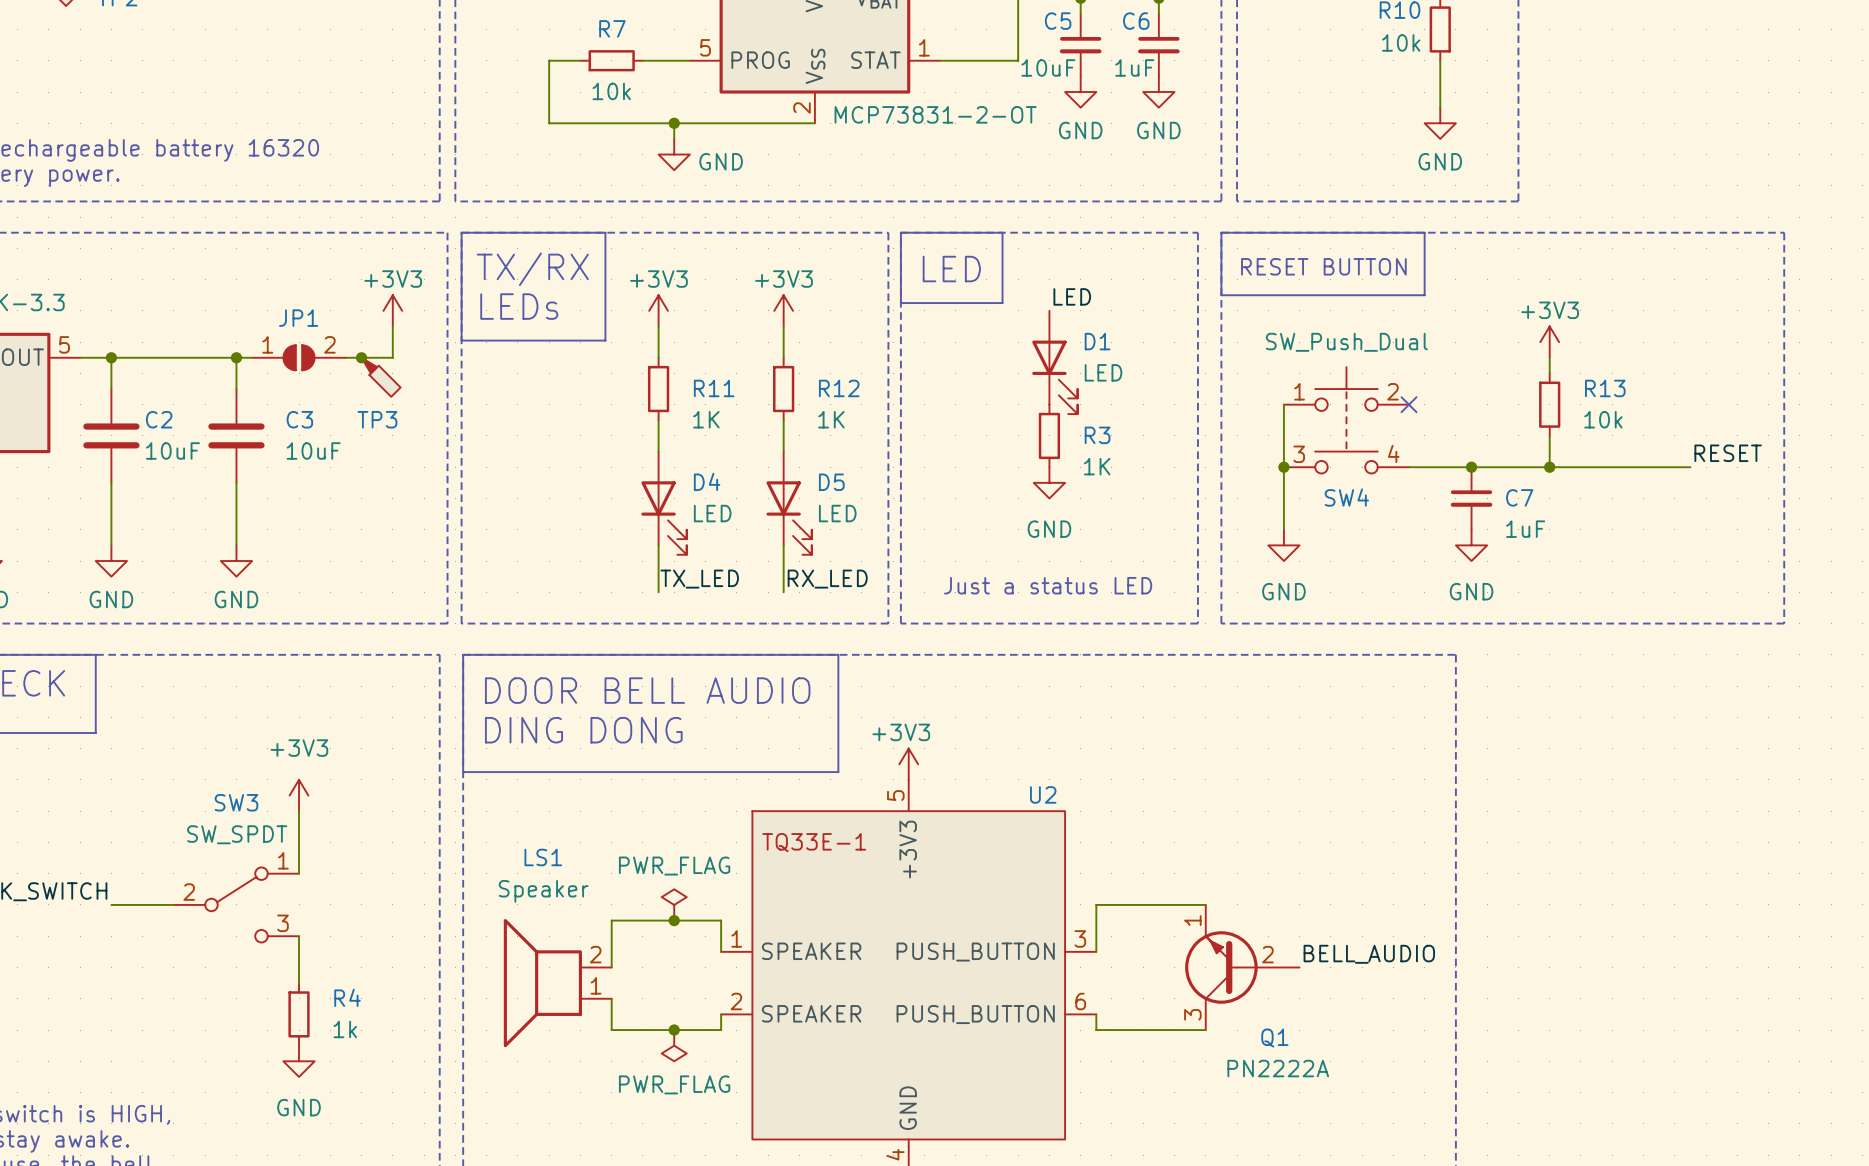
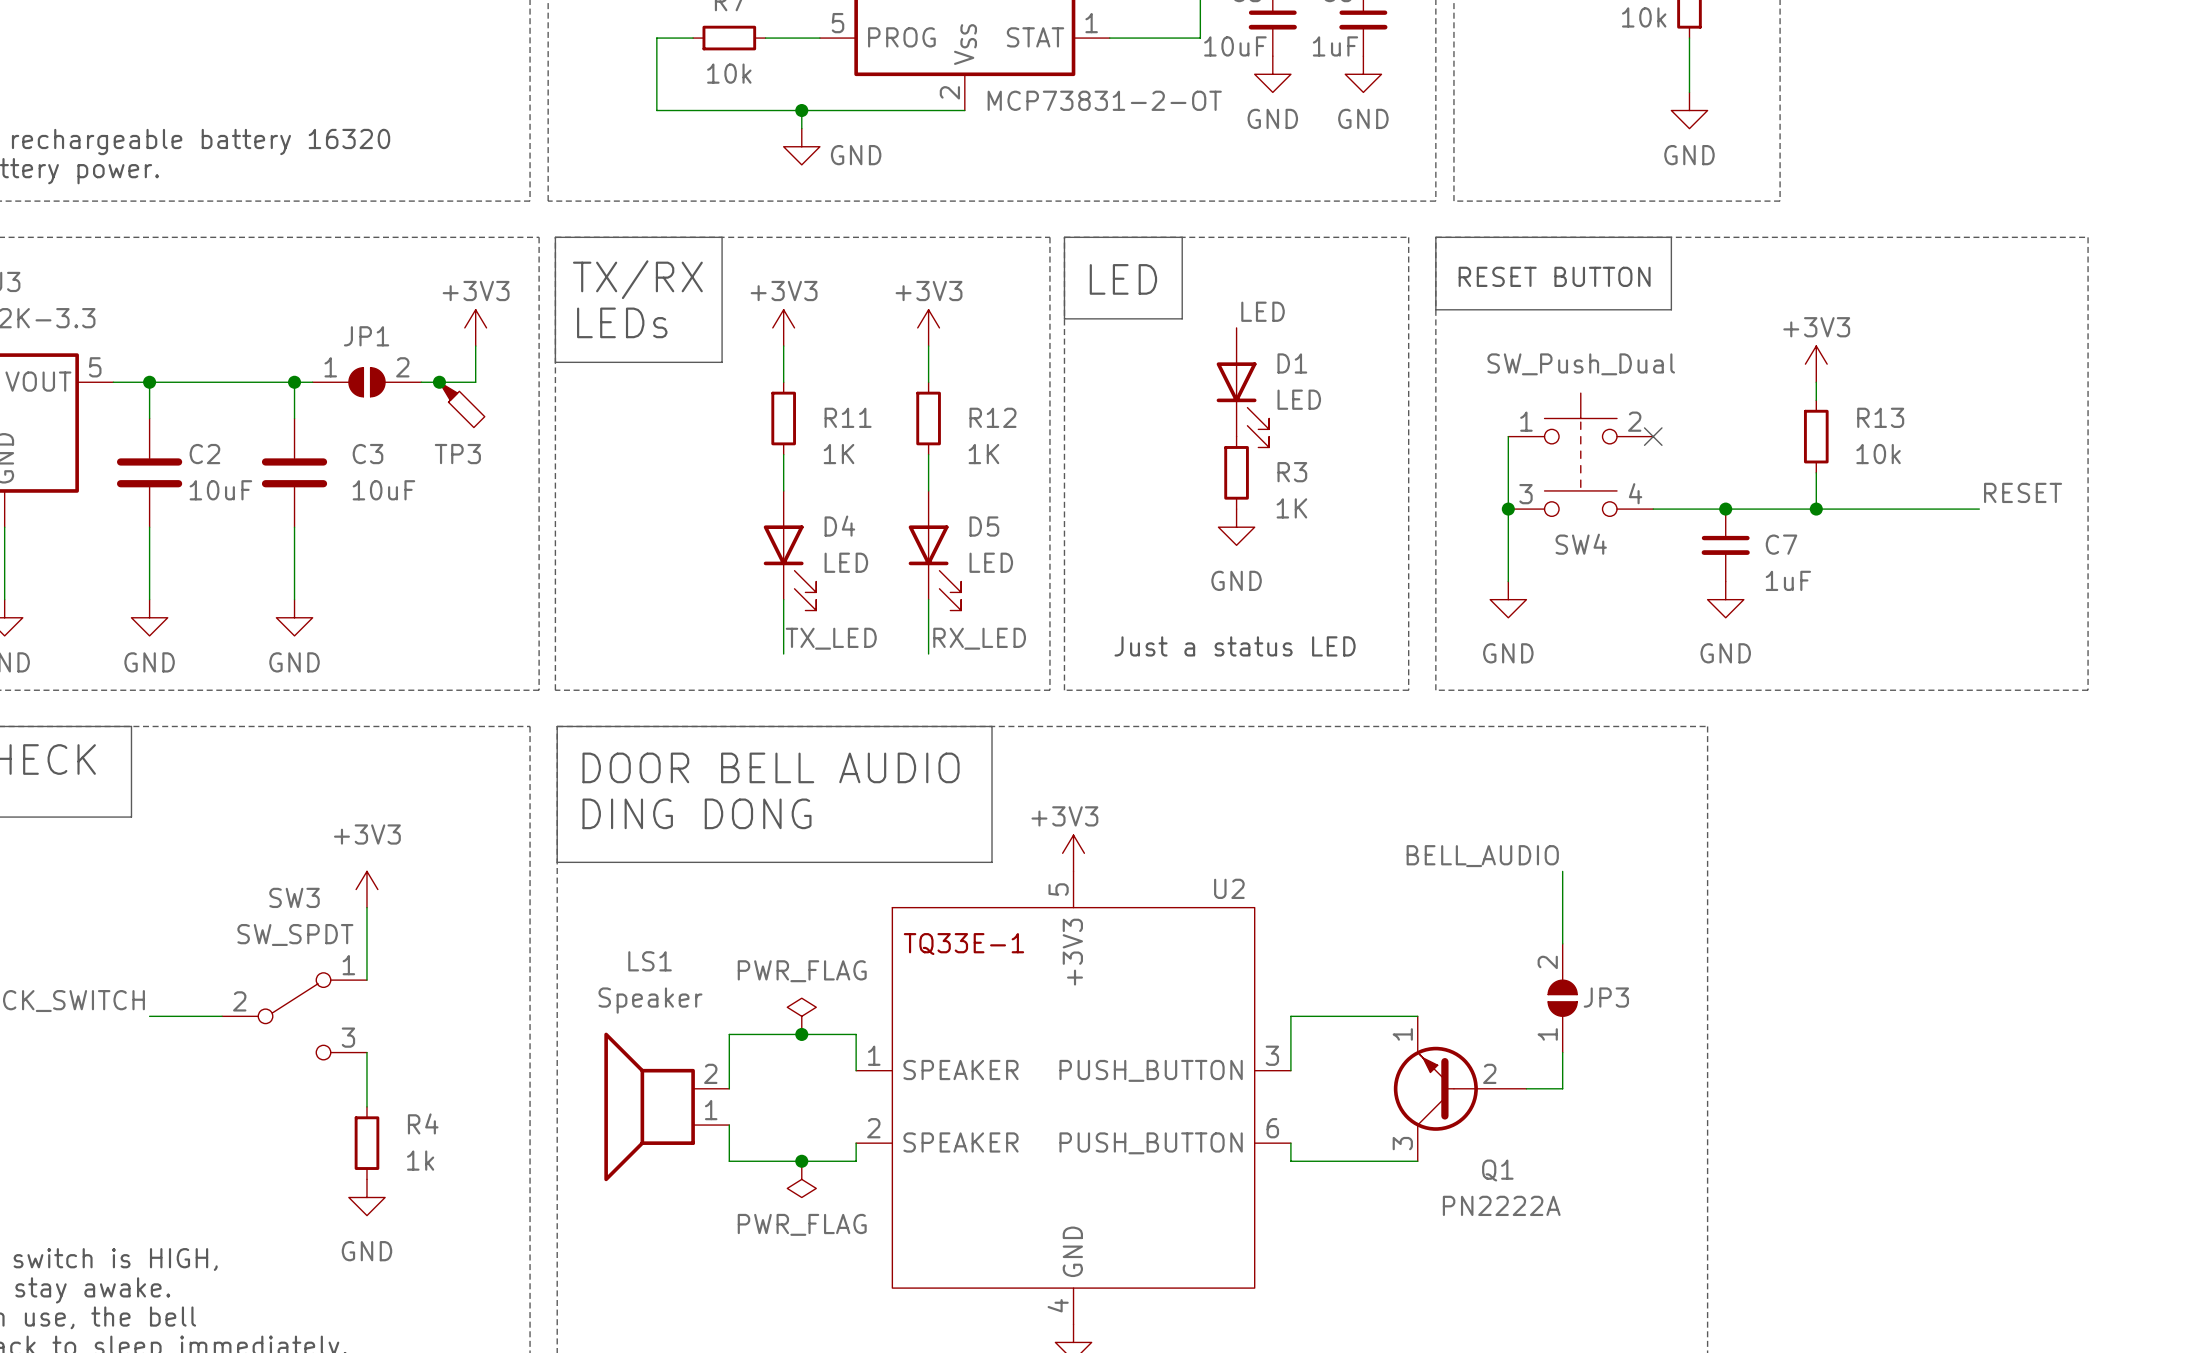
wire: none -> (1562, 871) (1562, 943)
JP3: none -> (1562, 998)
wire: none -> (1562, 1052) (1562, 1088) (1526, 1088)
label position: BELL_AUDIO (1369, 954) -> BELL_AUDIO (1482, 856)

